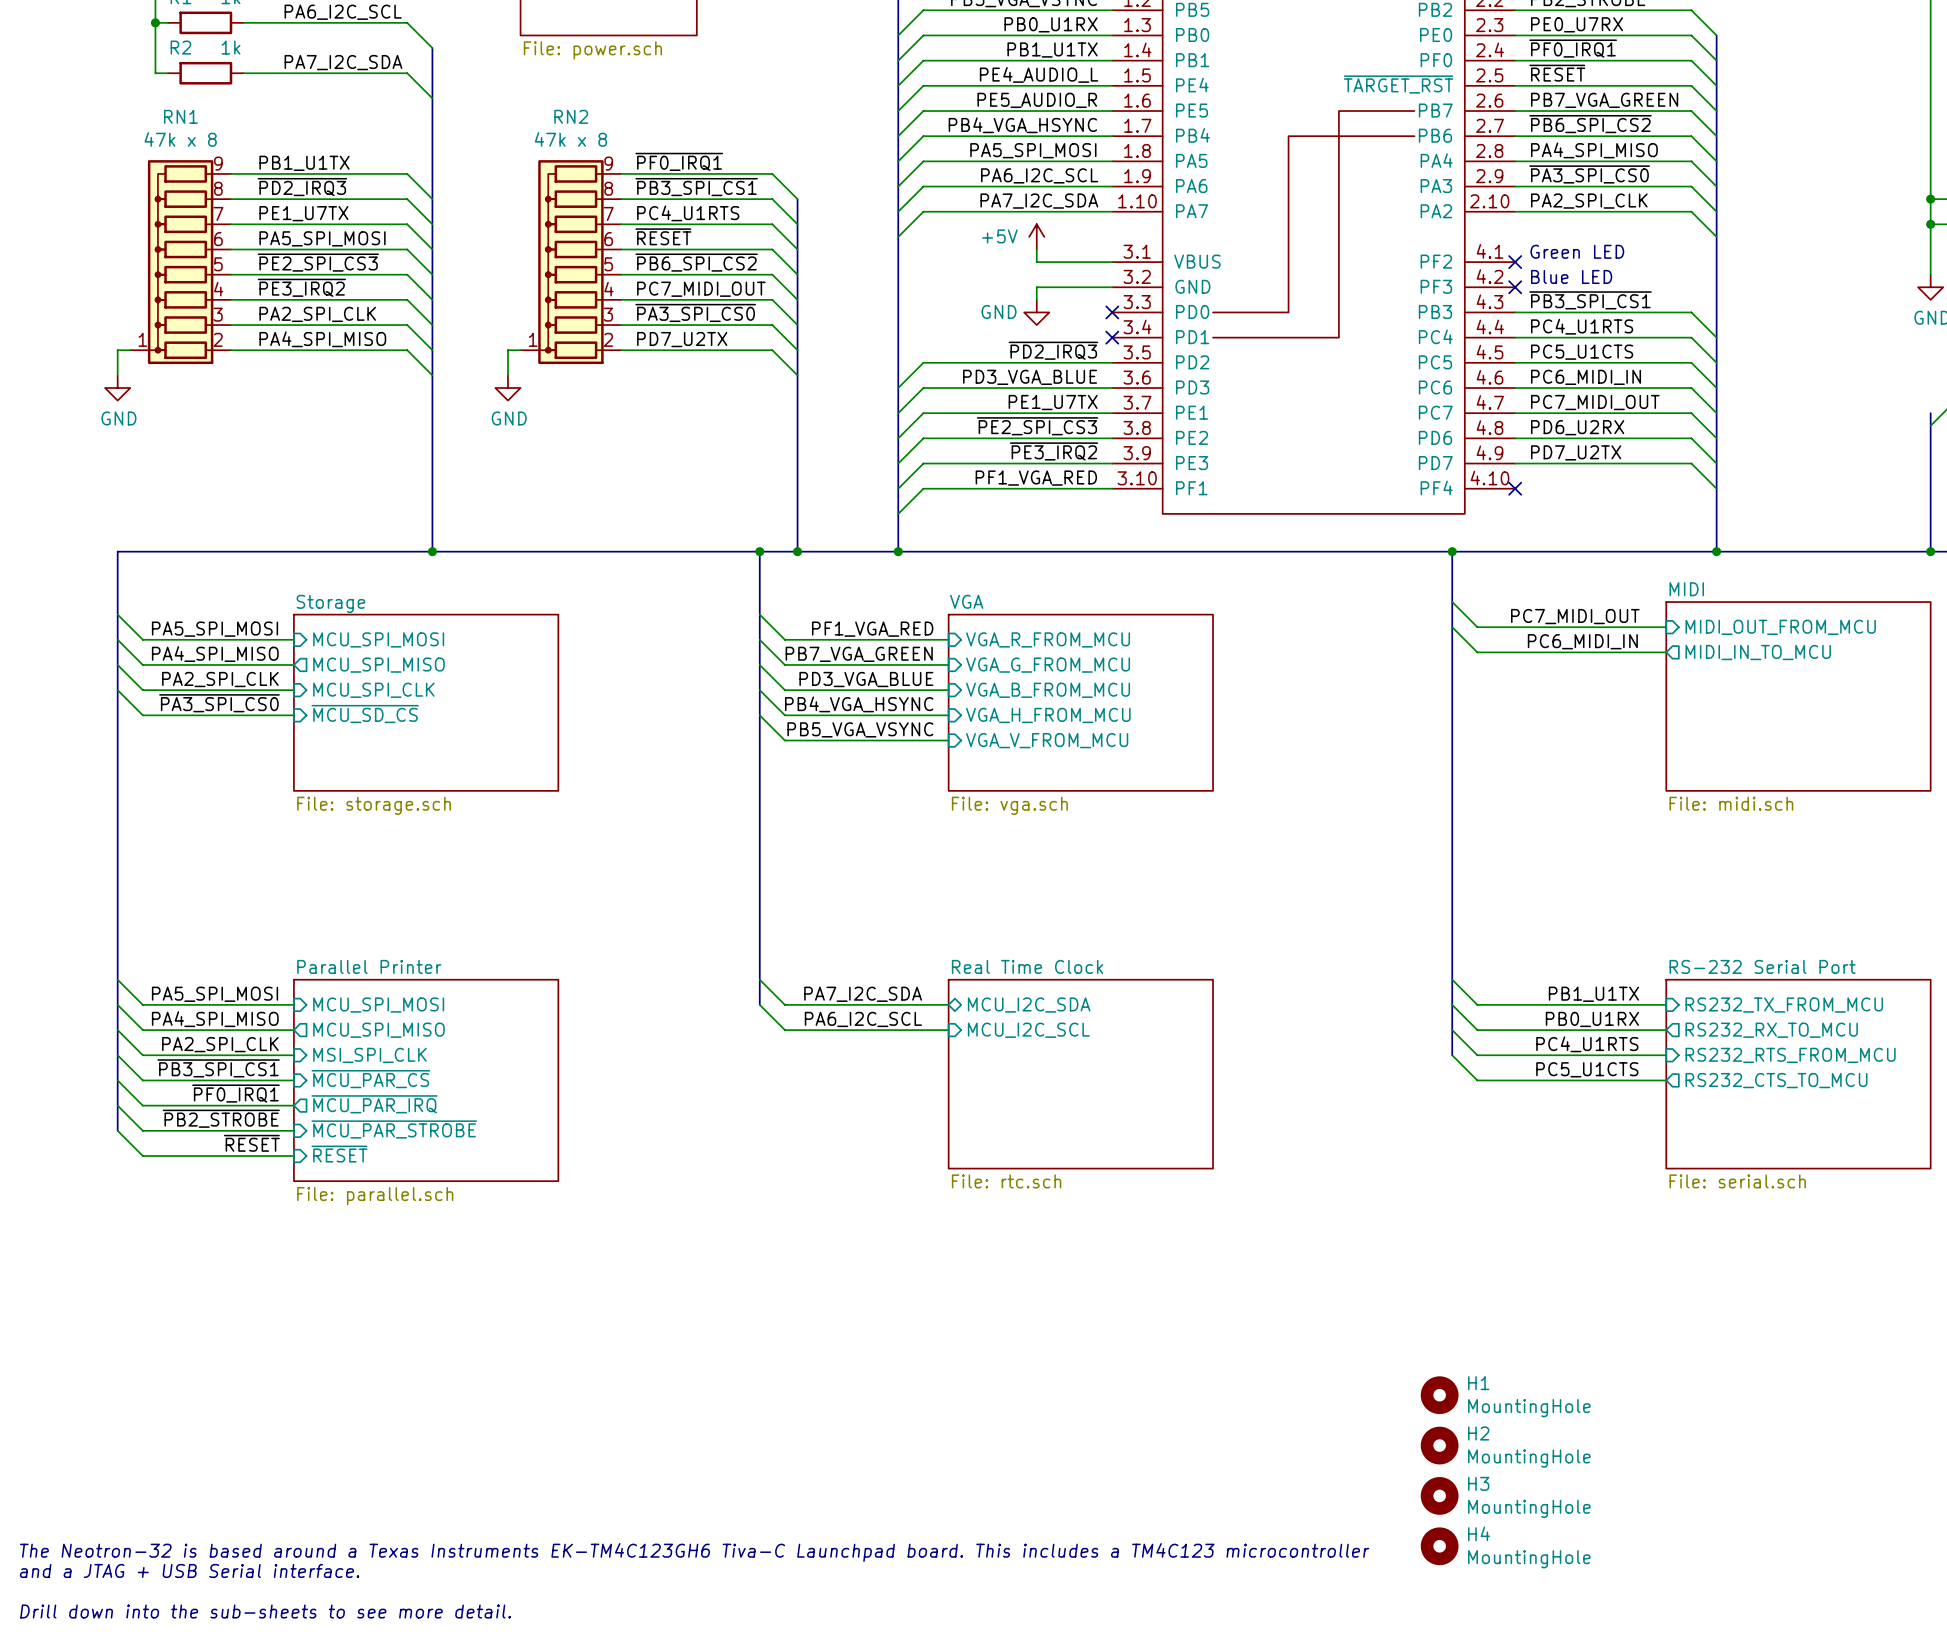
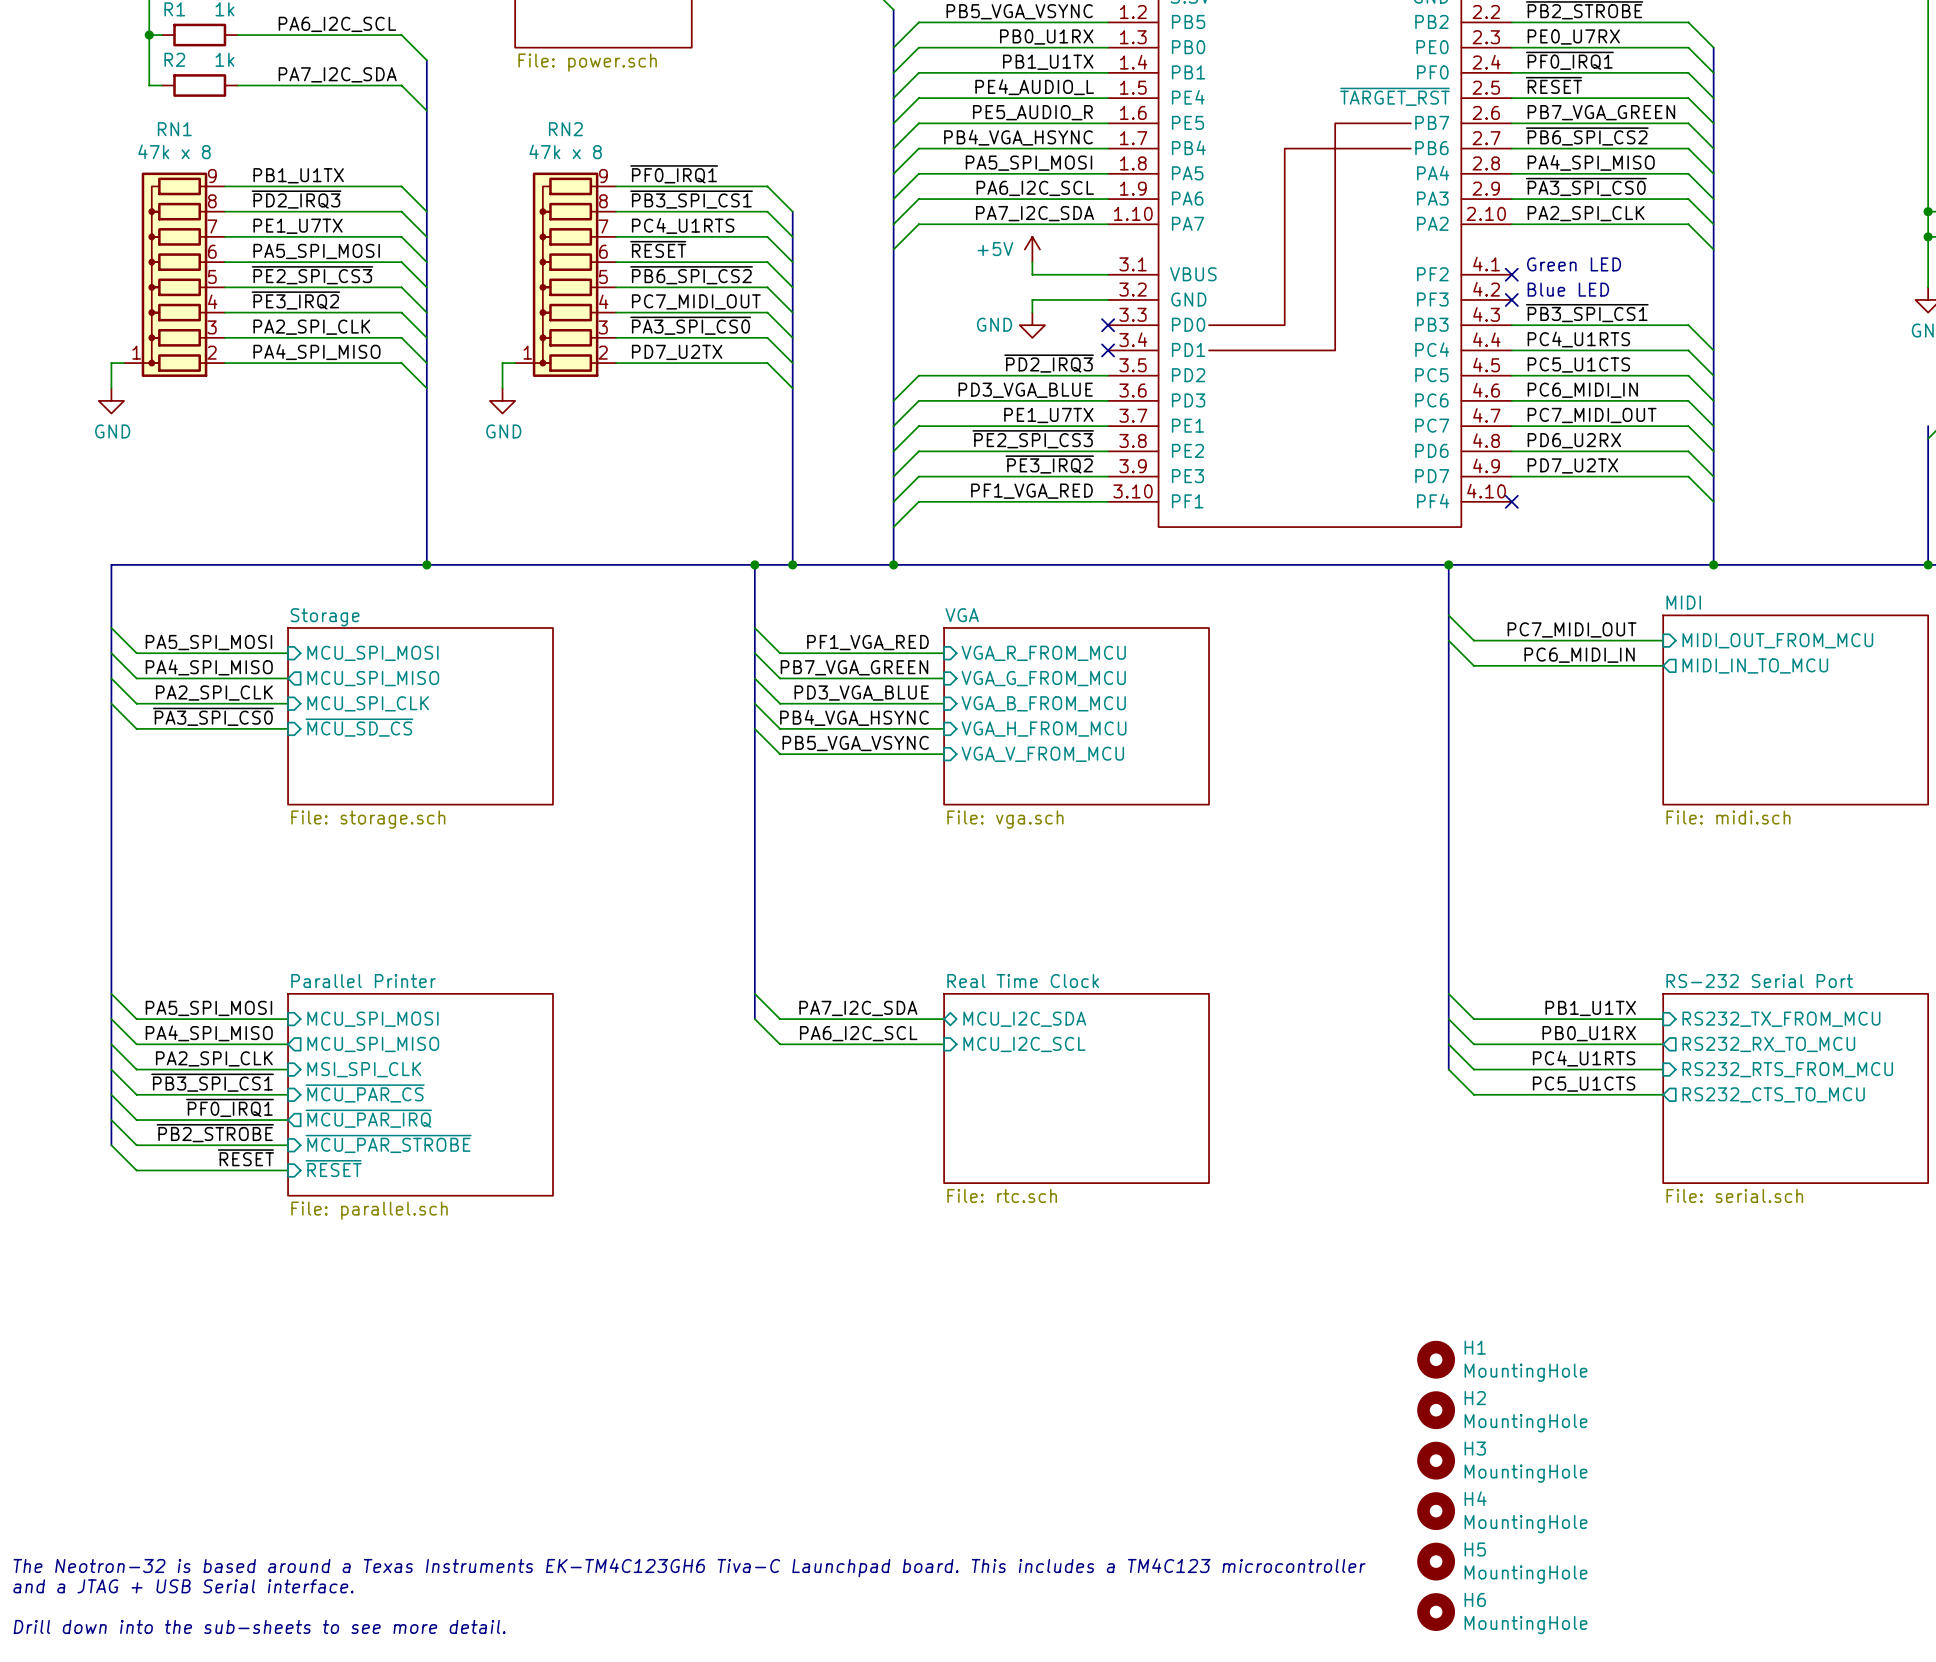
H1: none -> MountingHole (1436, 1359)
H1 name: H1 (1478, 1383) -> H2 (1475, 1398)
H2 name: H2 (1478, 1433) -> H3 (1475, 1448)
H3 name: H3 (1478, 1483) -> H4 (1475, 1498)
H4 name: H4 (1479, 1533) -> H5 (1475, 1549)
H6: none -> MountingHole (1436, 1612)

